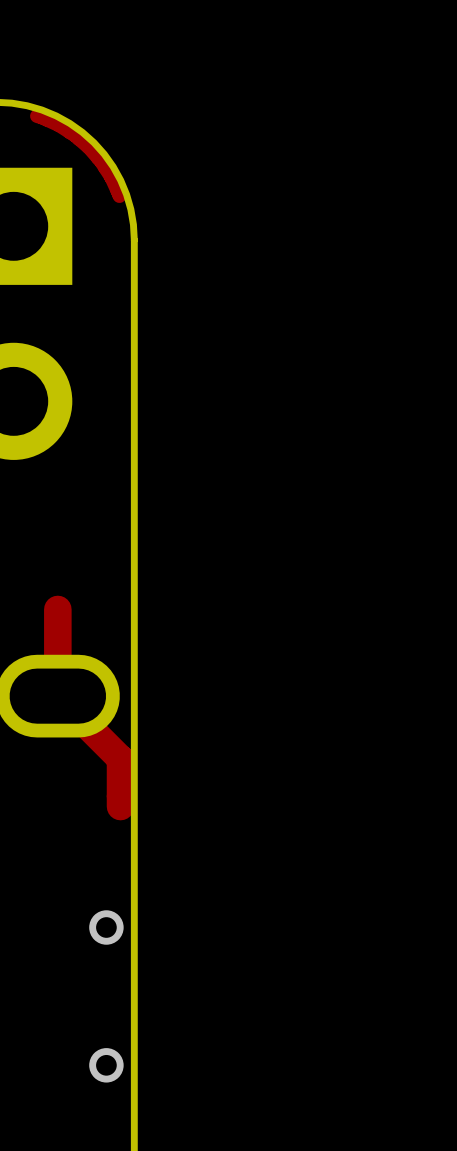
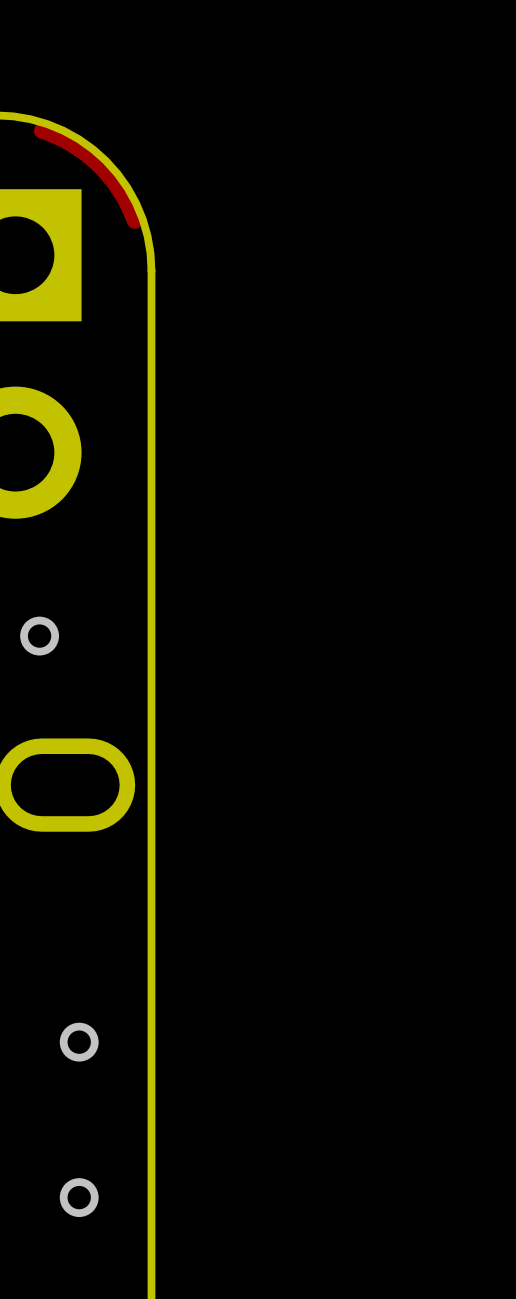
via: none -> (39, 636)
track: (57, 609) (57, 696) (120, 758) (120, 806) -> none
via position: (106, 927) -> (79, 1042)
via position: (106, 1065) -> (79, 1197)

